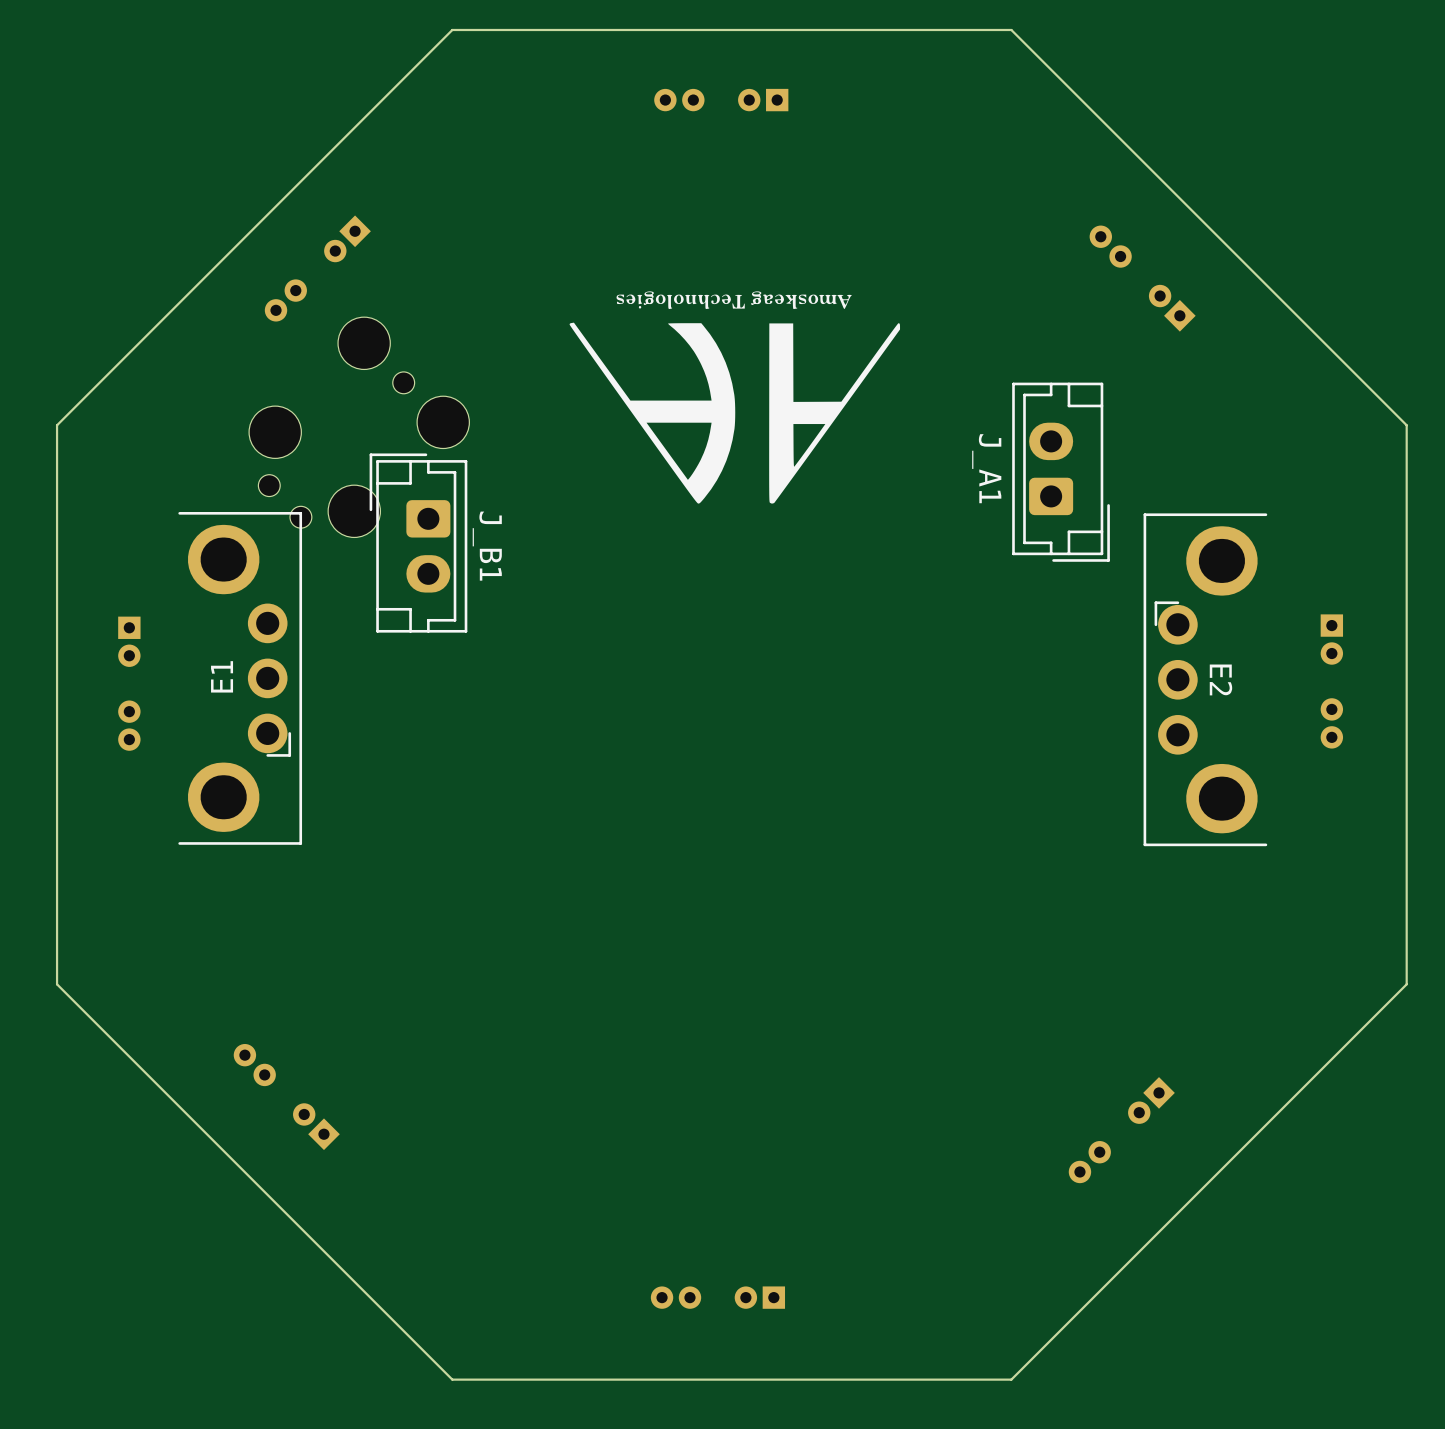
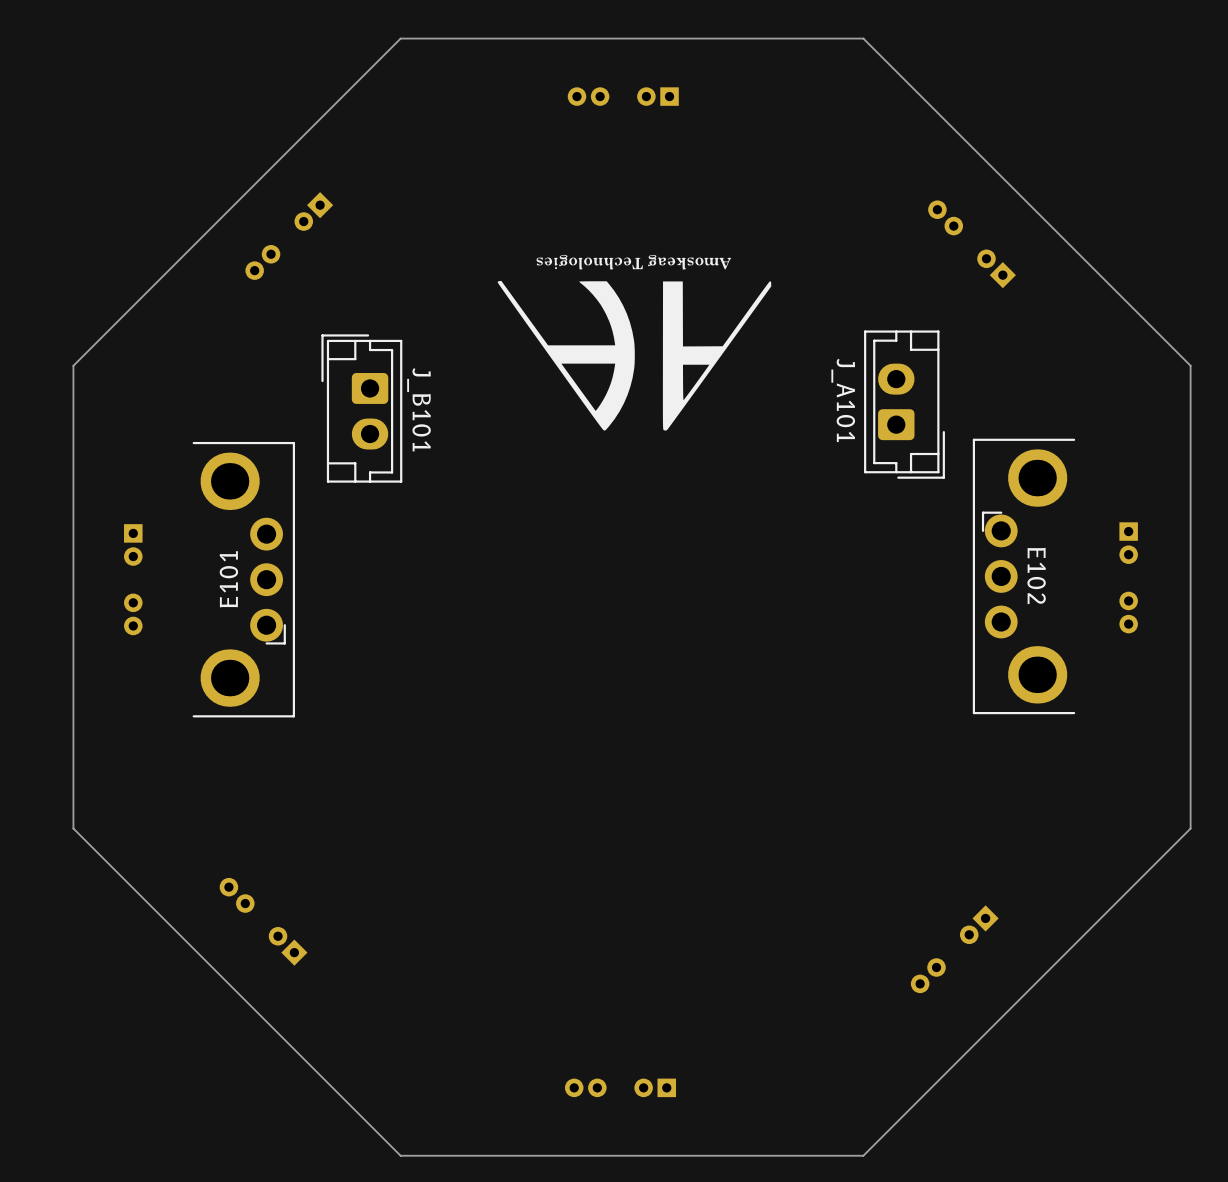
part: (359, 427) -> none
J_A1 name: J_A1 (986, 468) -> J_A101 (843, 400)
J_B101: none -> (361, 408)
J_B1: (418, 543) -> none
E1: (240, 678) -> none
E2 name: E2 (1220, 679) -> E102 (1036, 575)
E101: none -> (243, 579)

